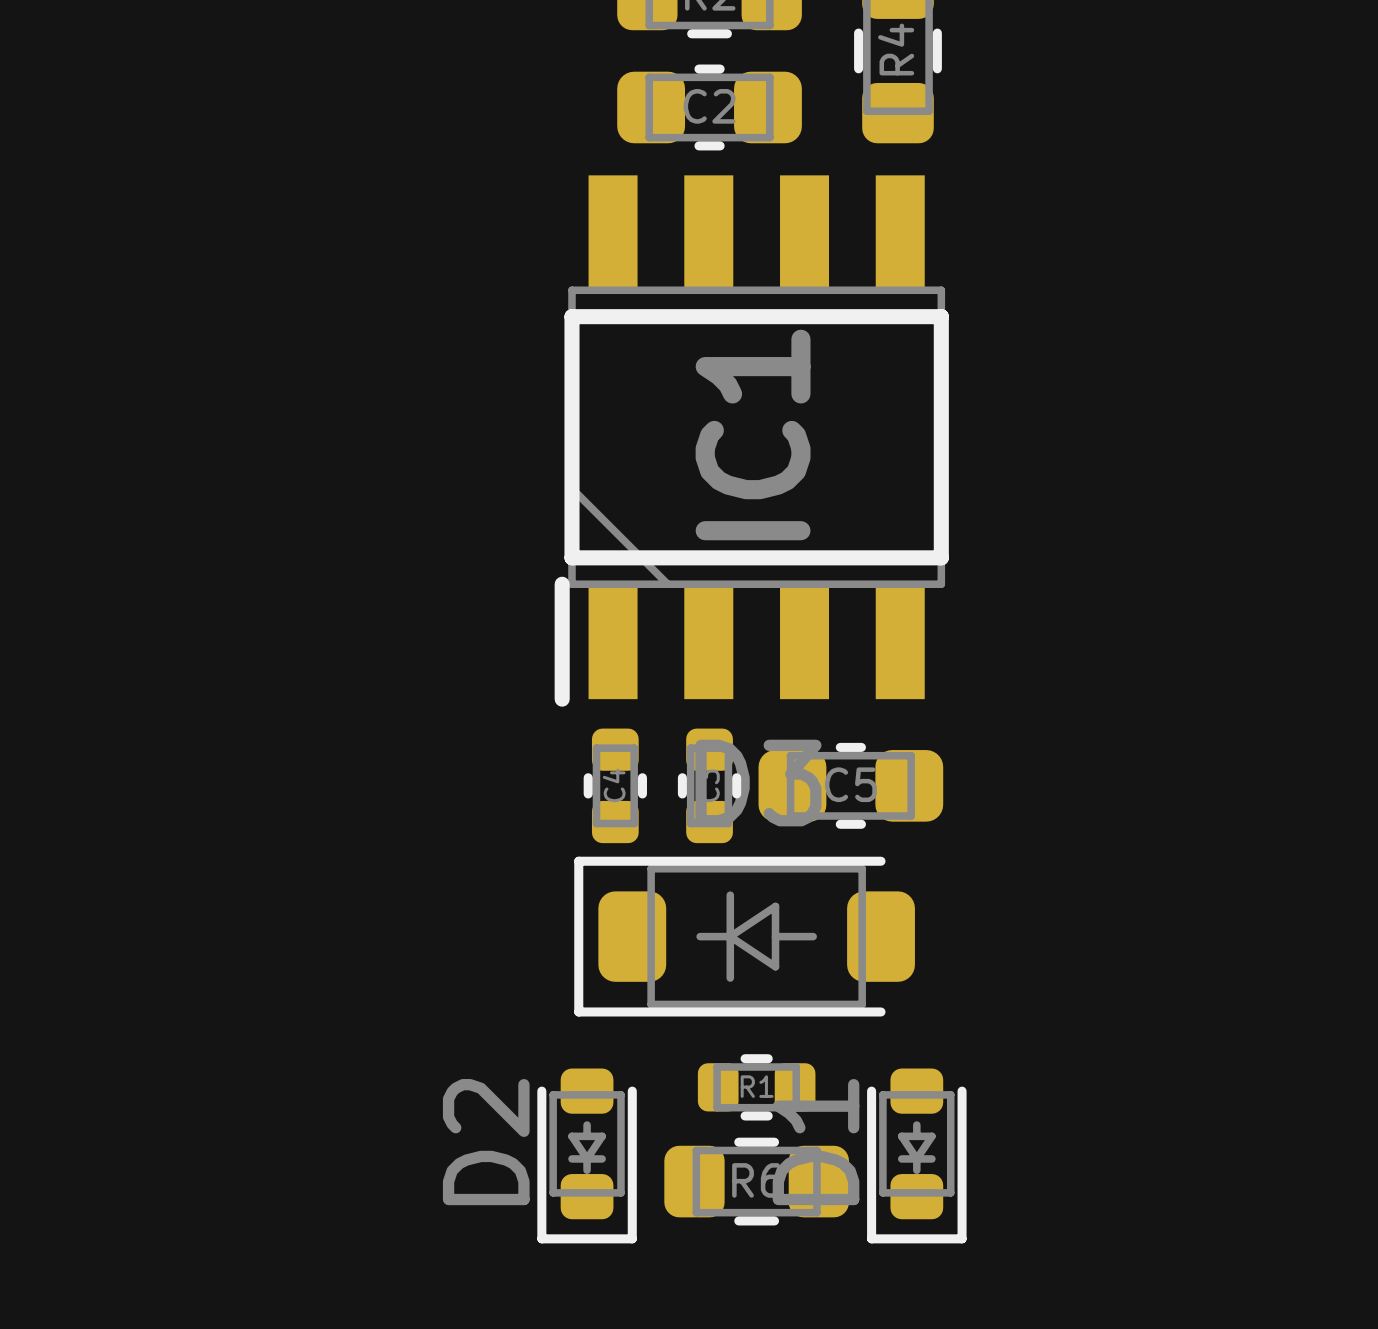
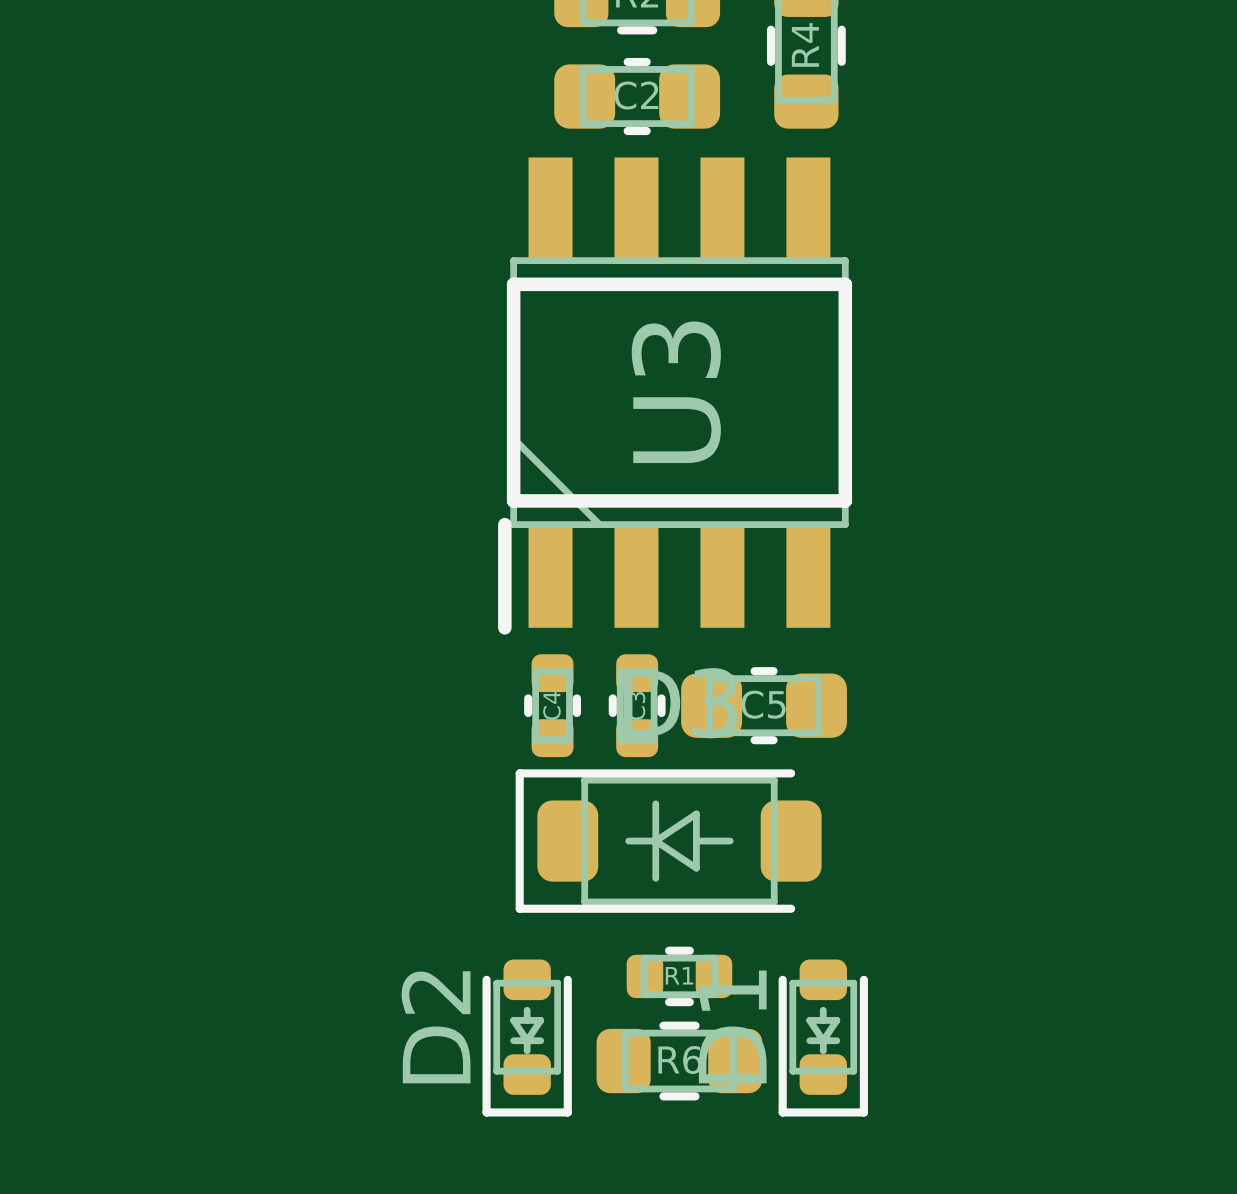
IC1 name: IC1 (753, 434) -> U3 (676, 392)

